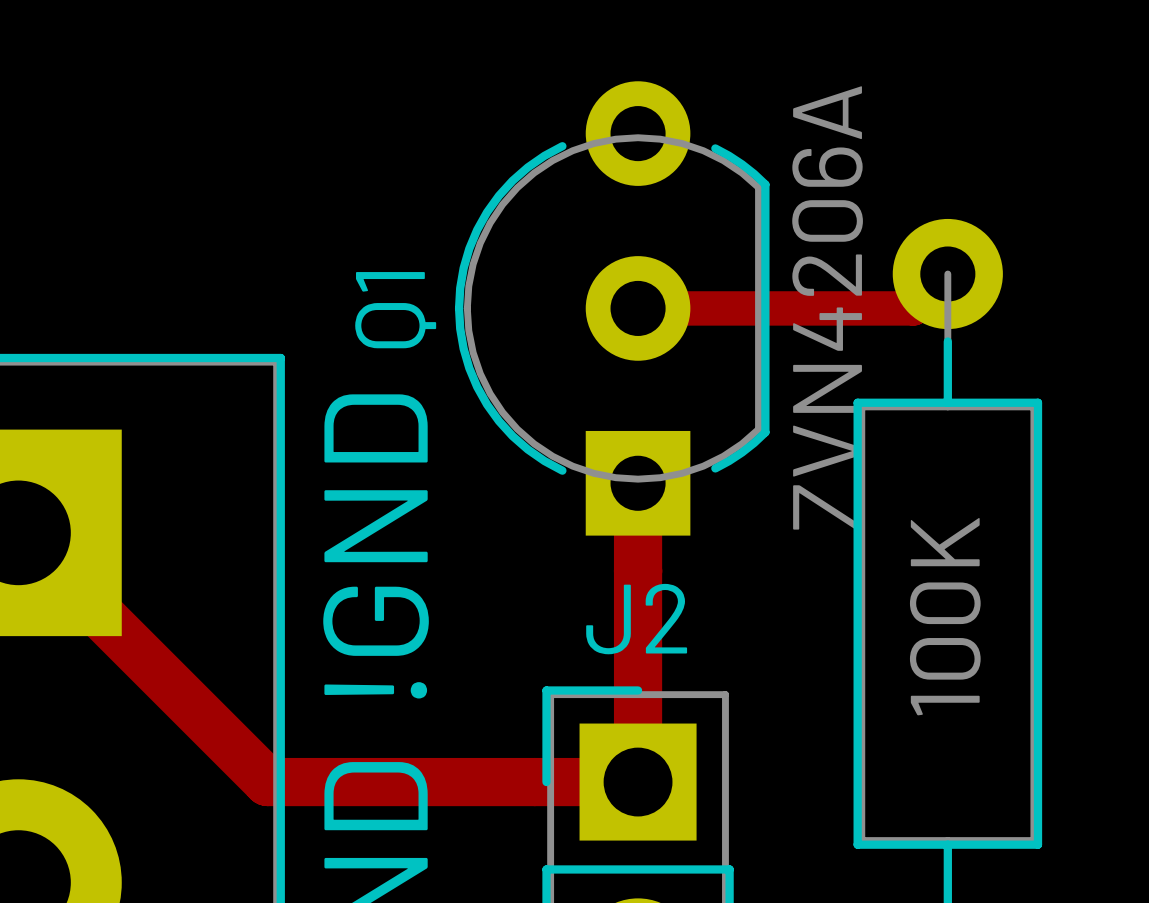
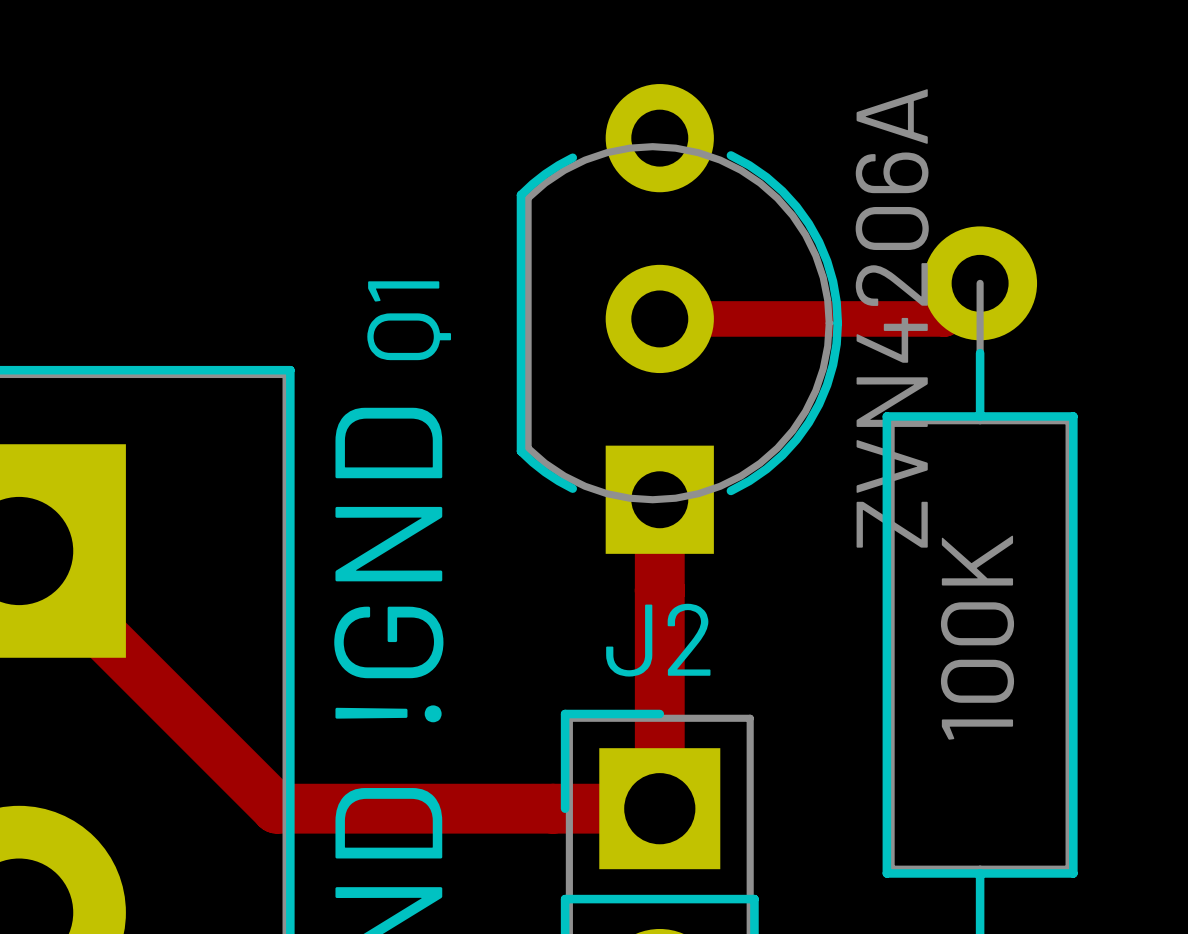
Q1 footprint: [454, 81, 770, 536] -> [516, 84, 843, 554]
Q1 value position: ZVN4206A (827, 307) -> ZVN4206A (892, 318)

